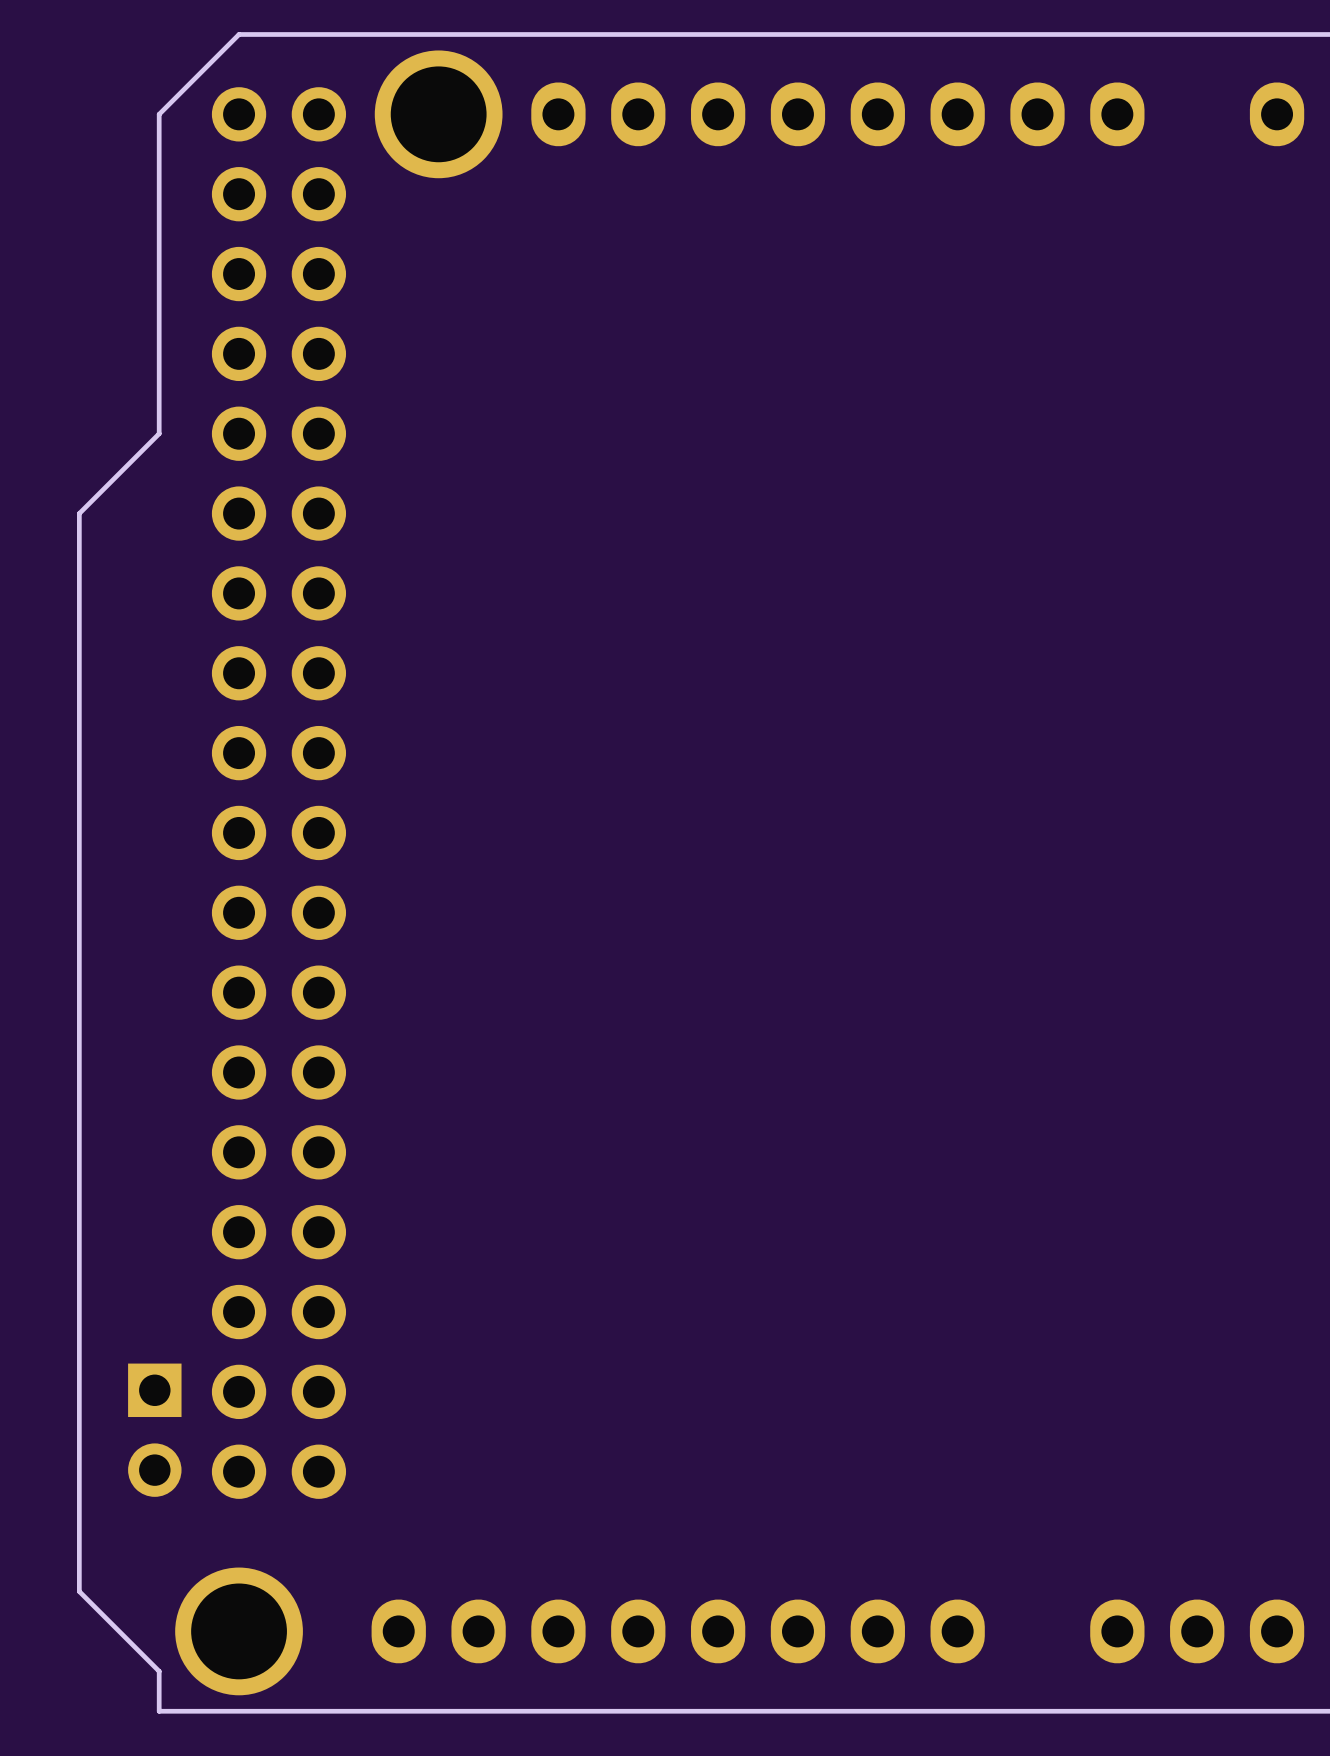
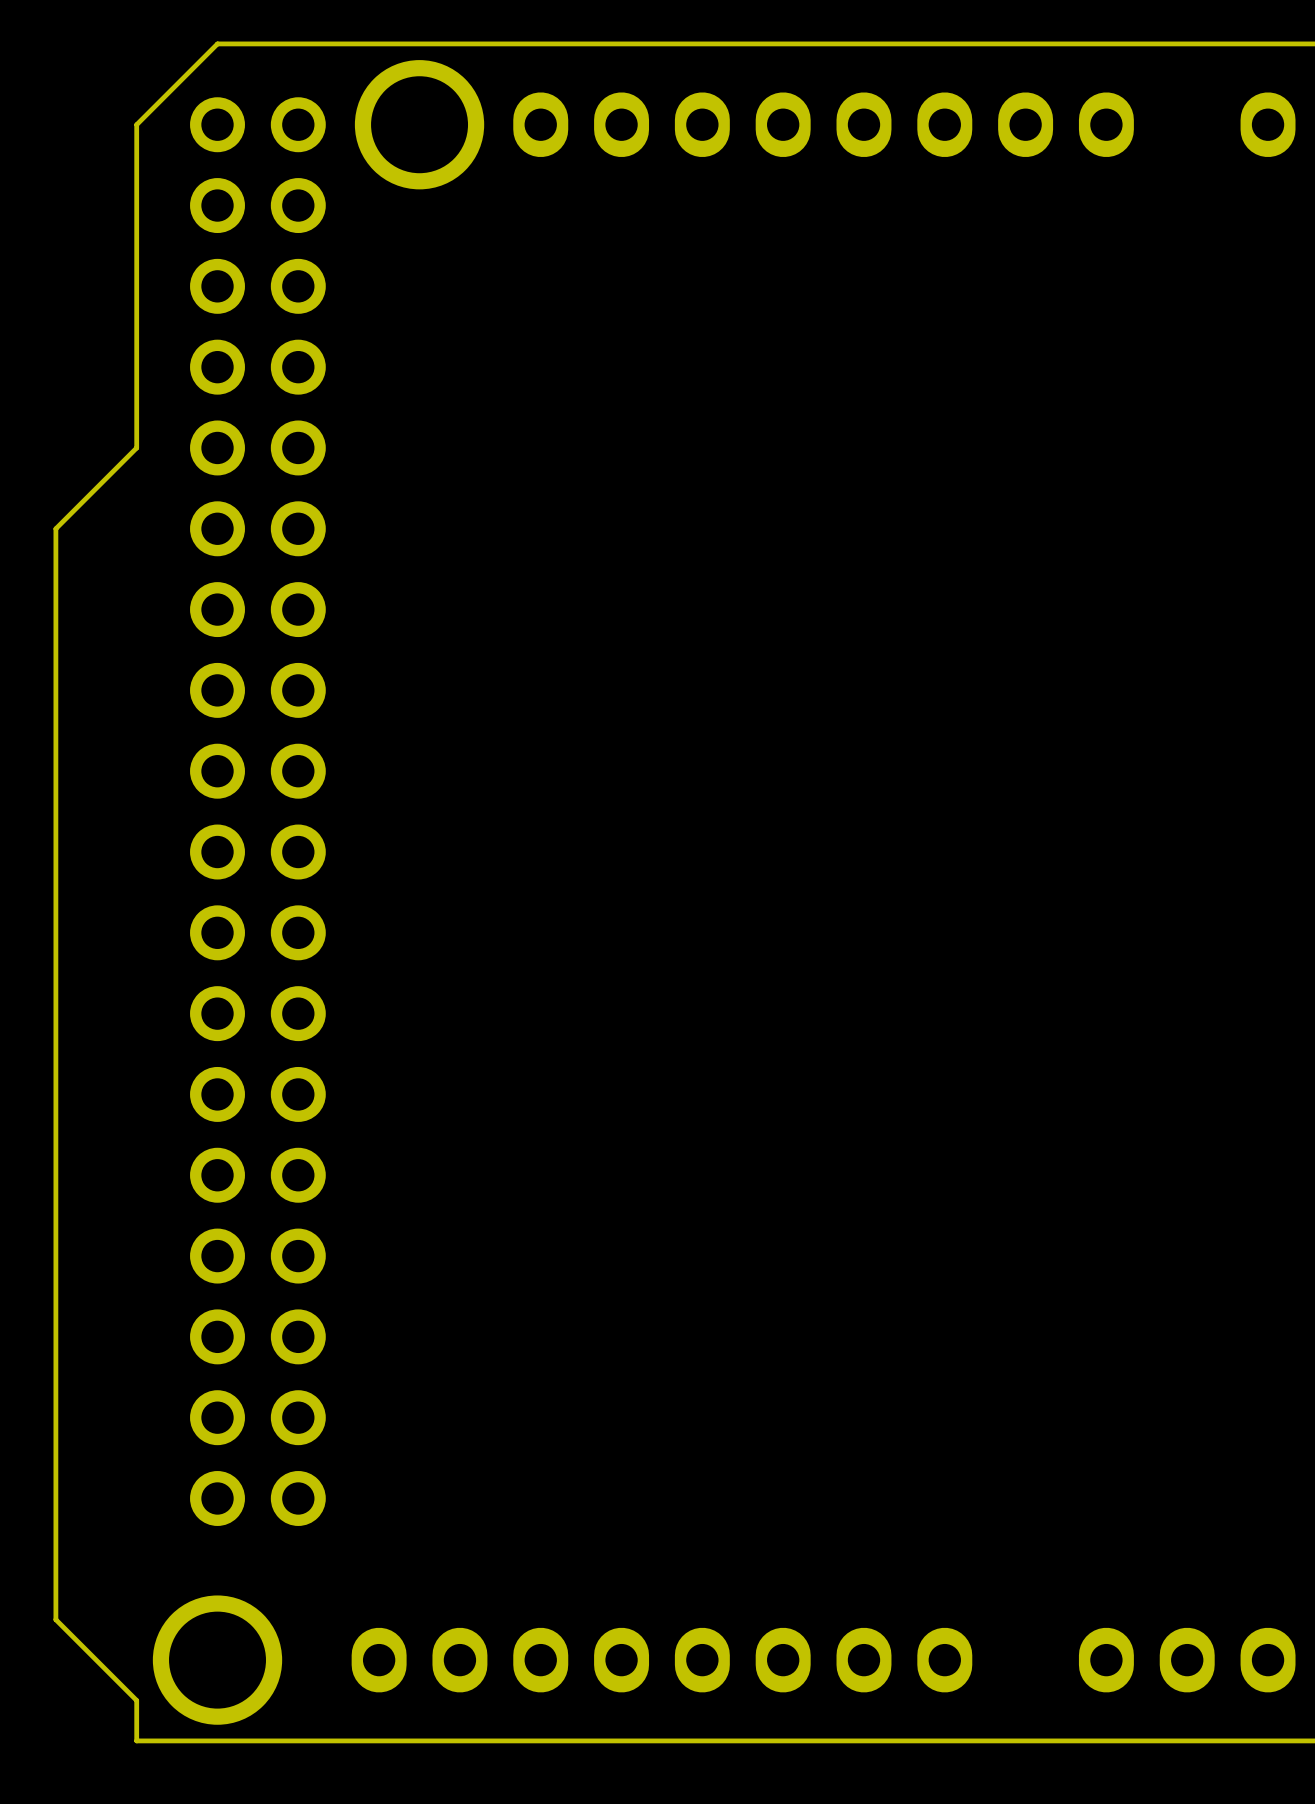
part: (154, 1430) -> none

